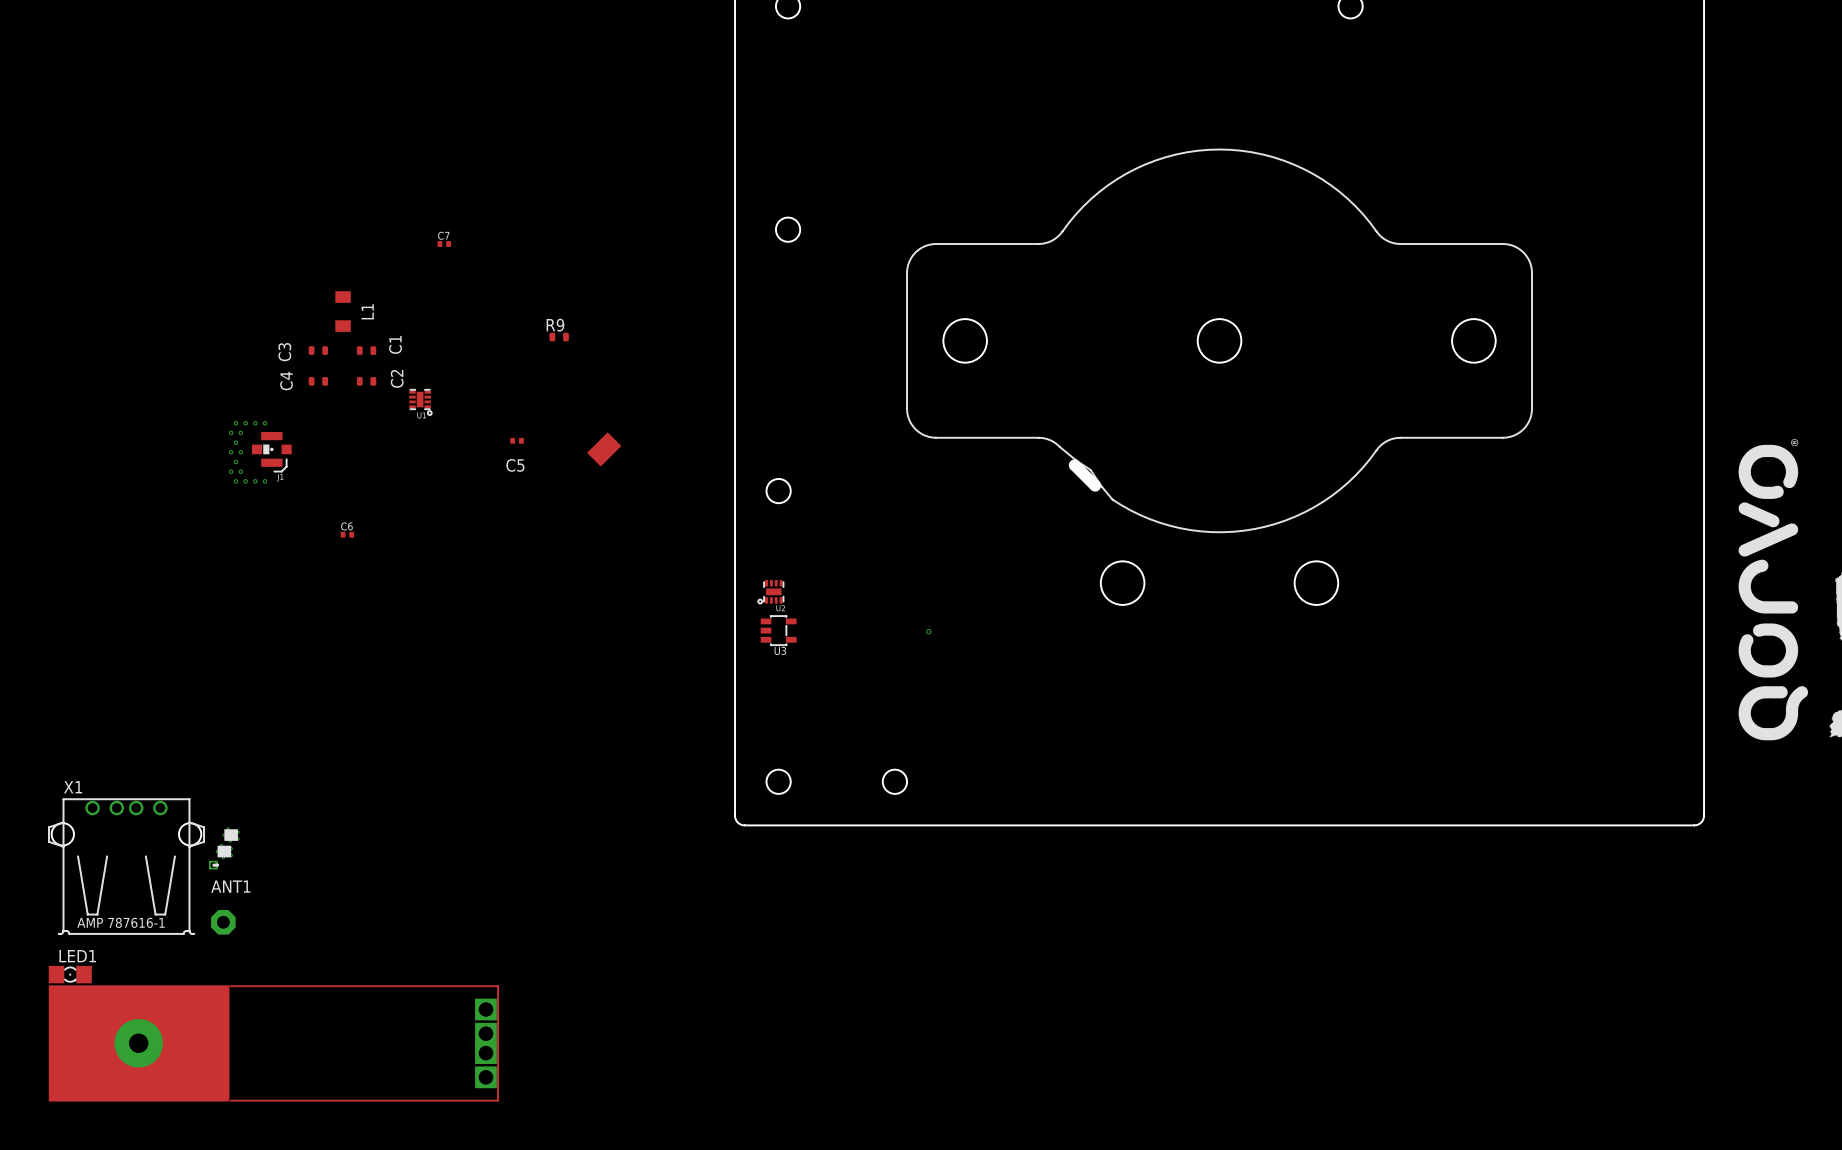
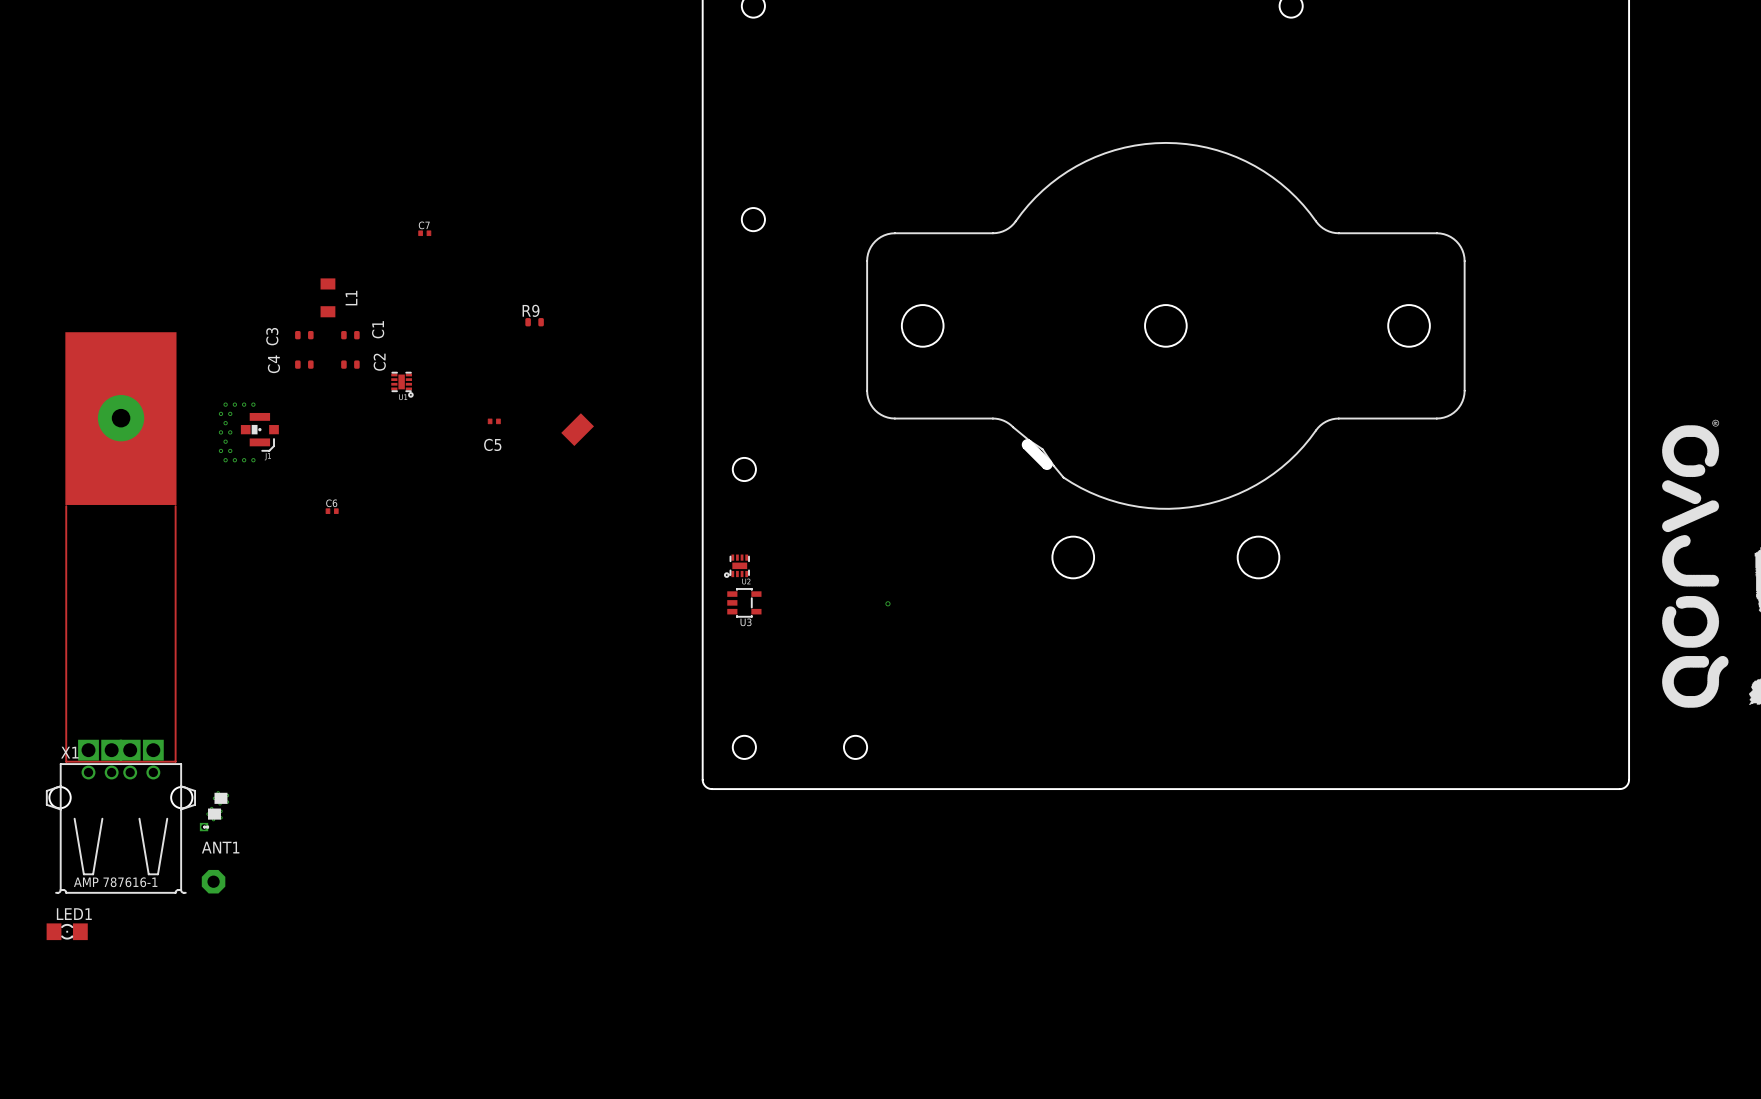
part: none -> (120, 547)
part: (273, 1043) -> none

